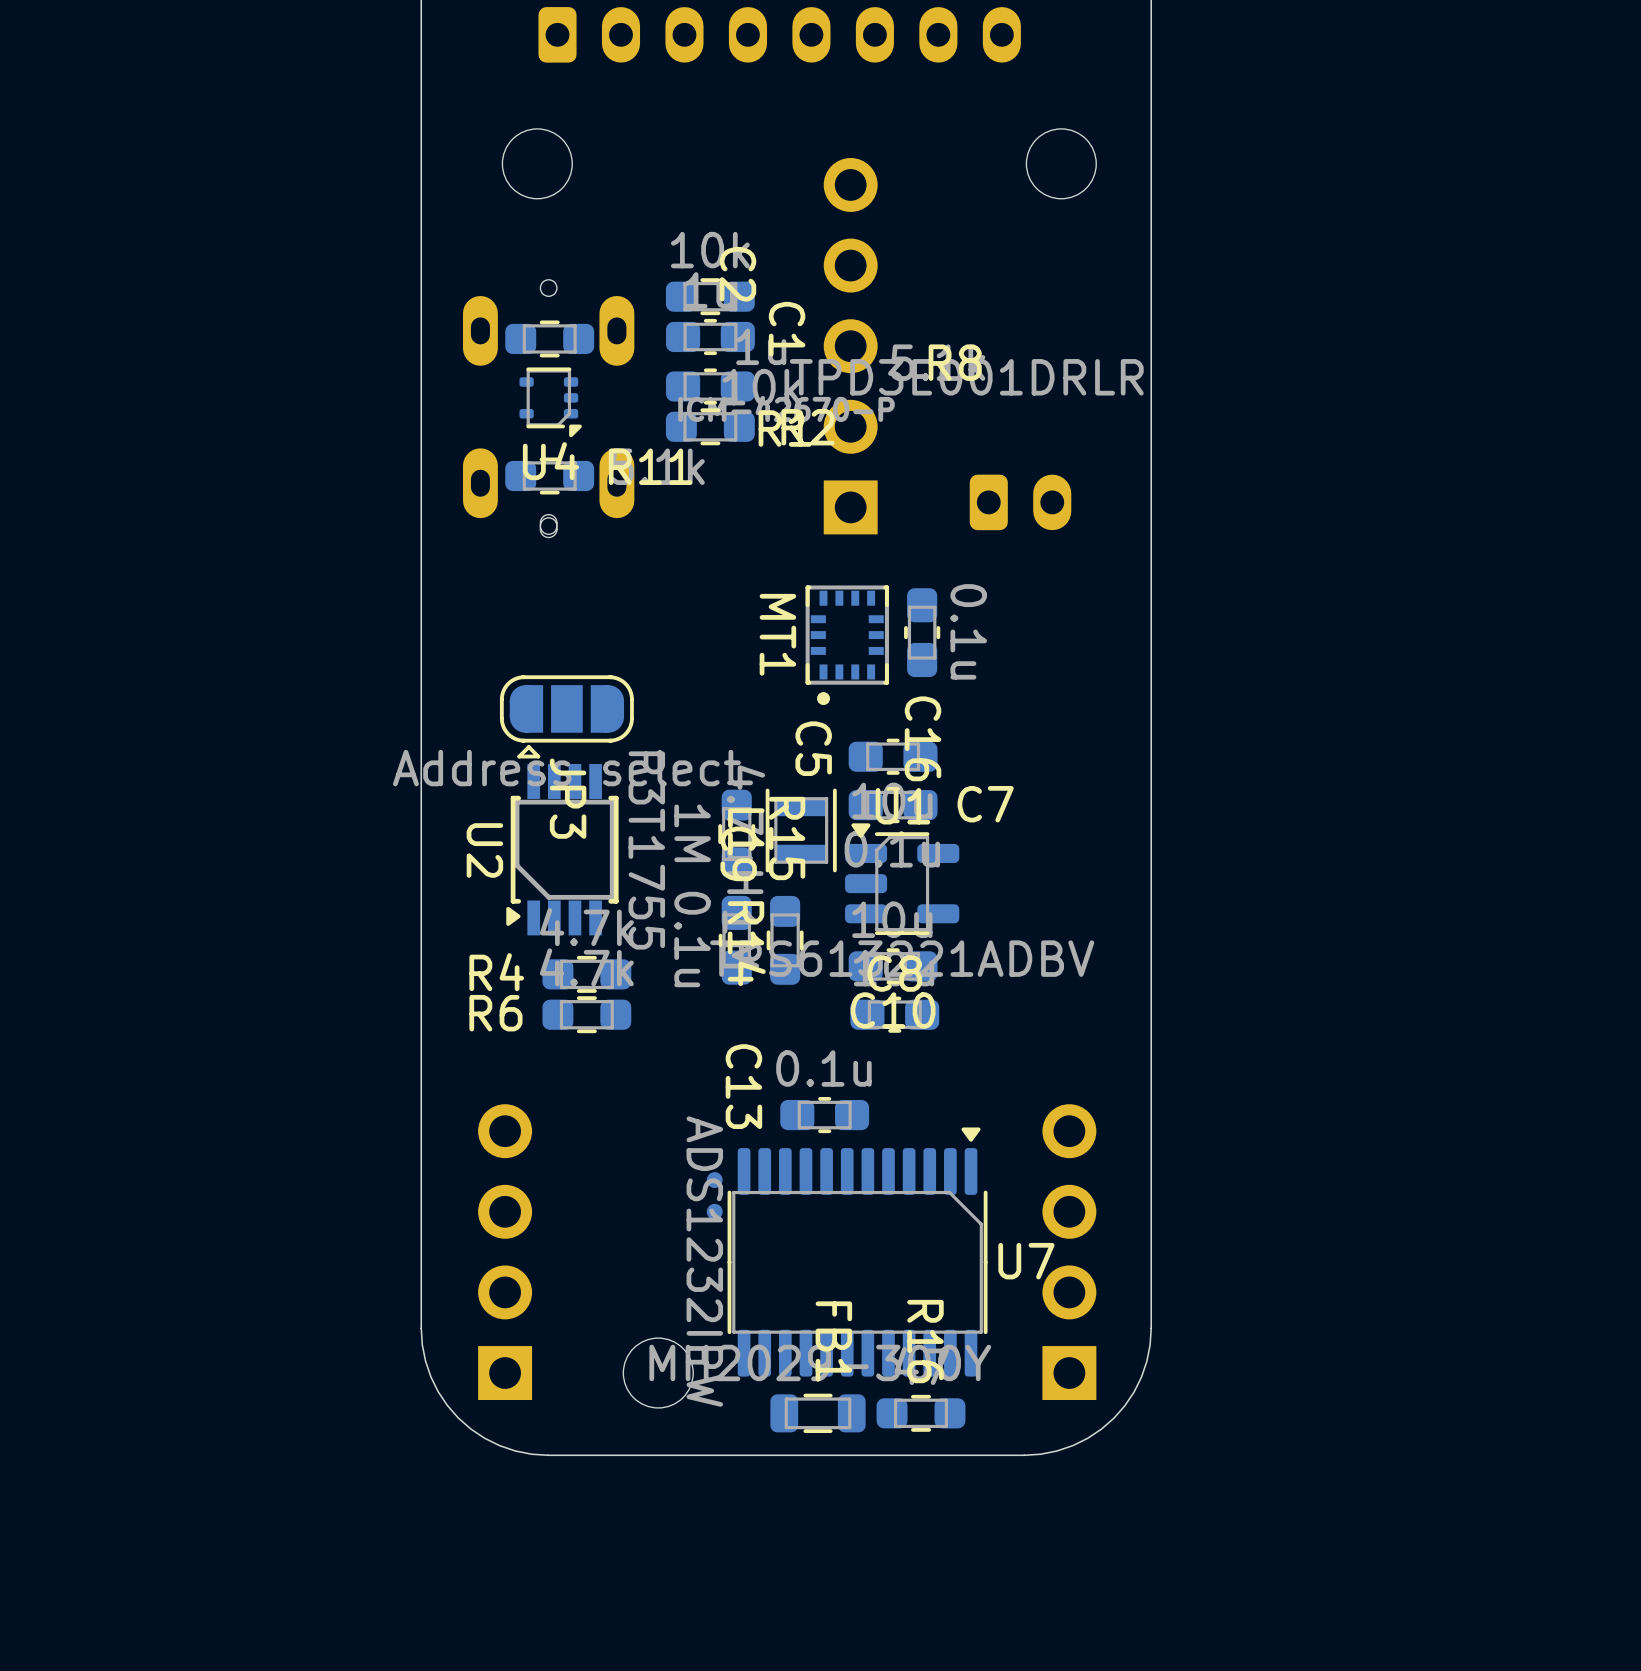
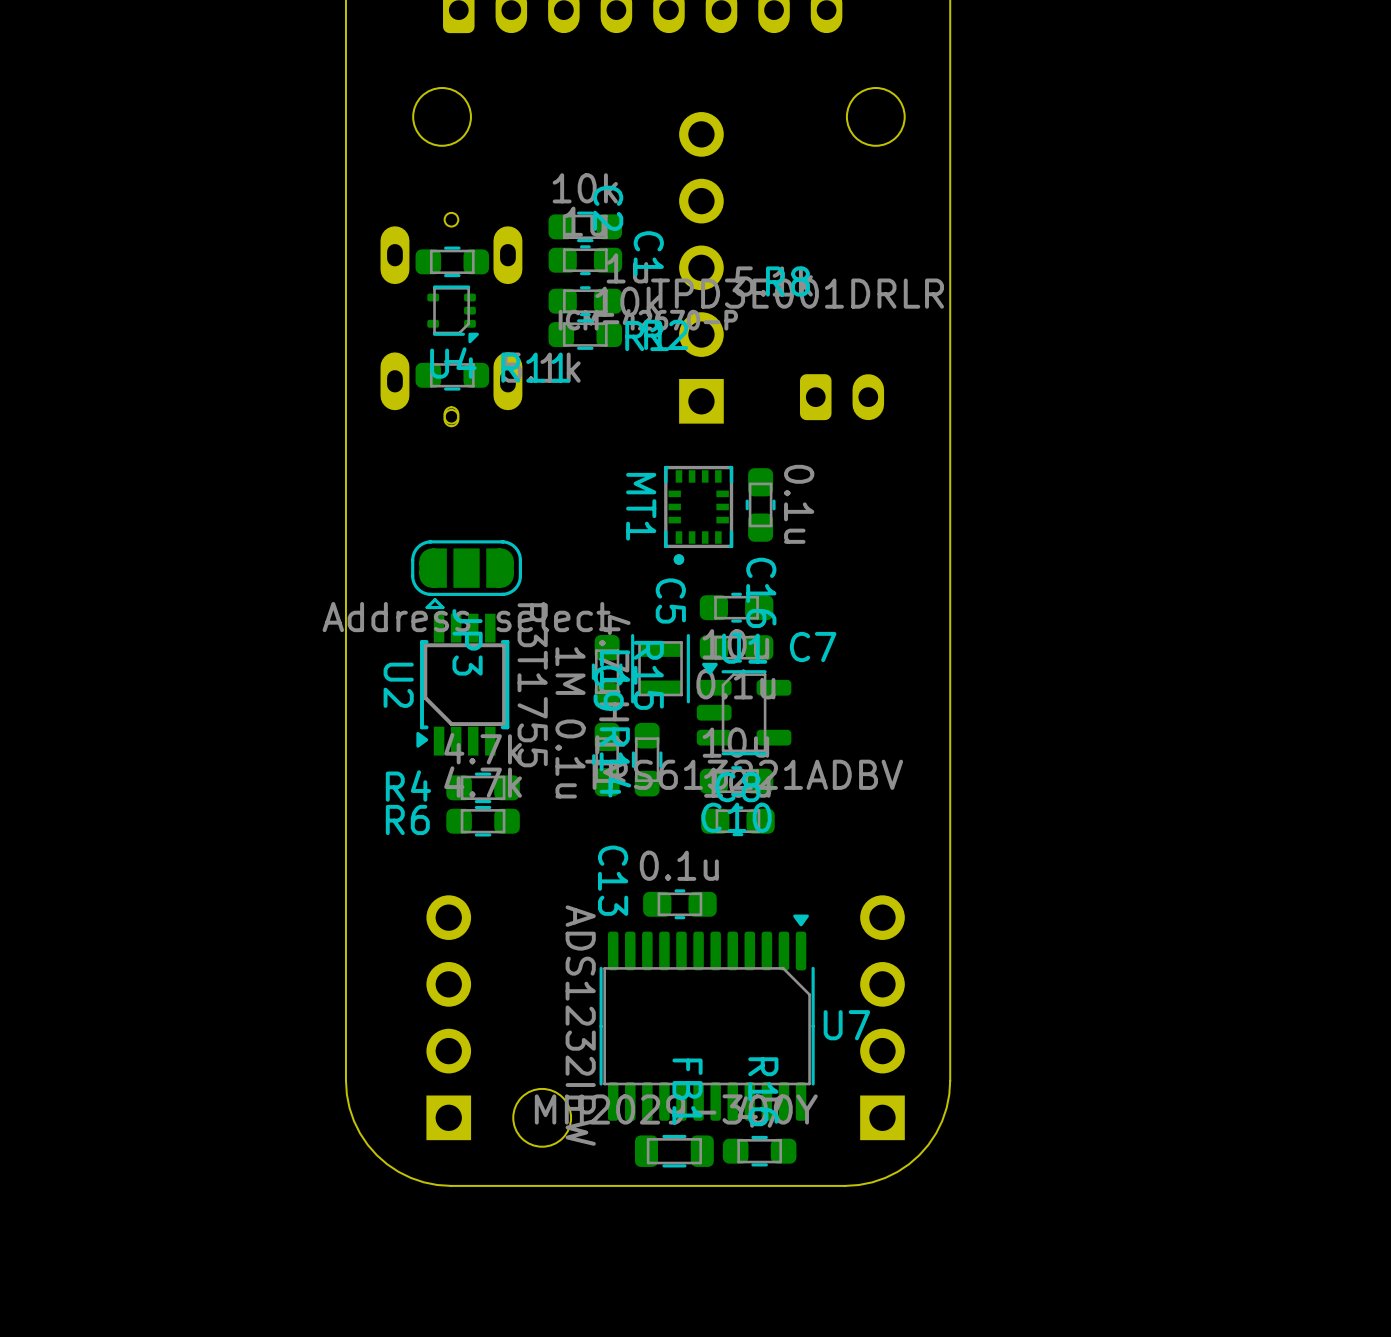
part: (714, 1195) -> none
part position: (505, 1252) -> (448, 1017)

